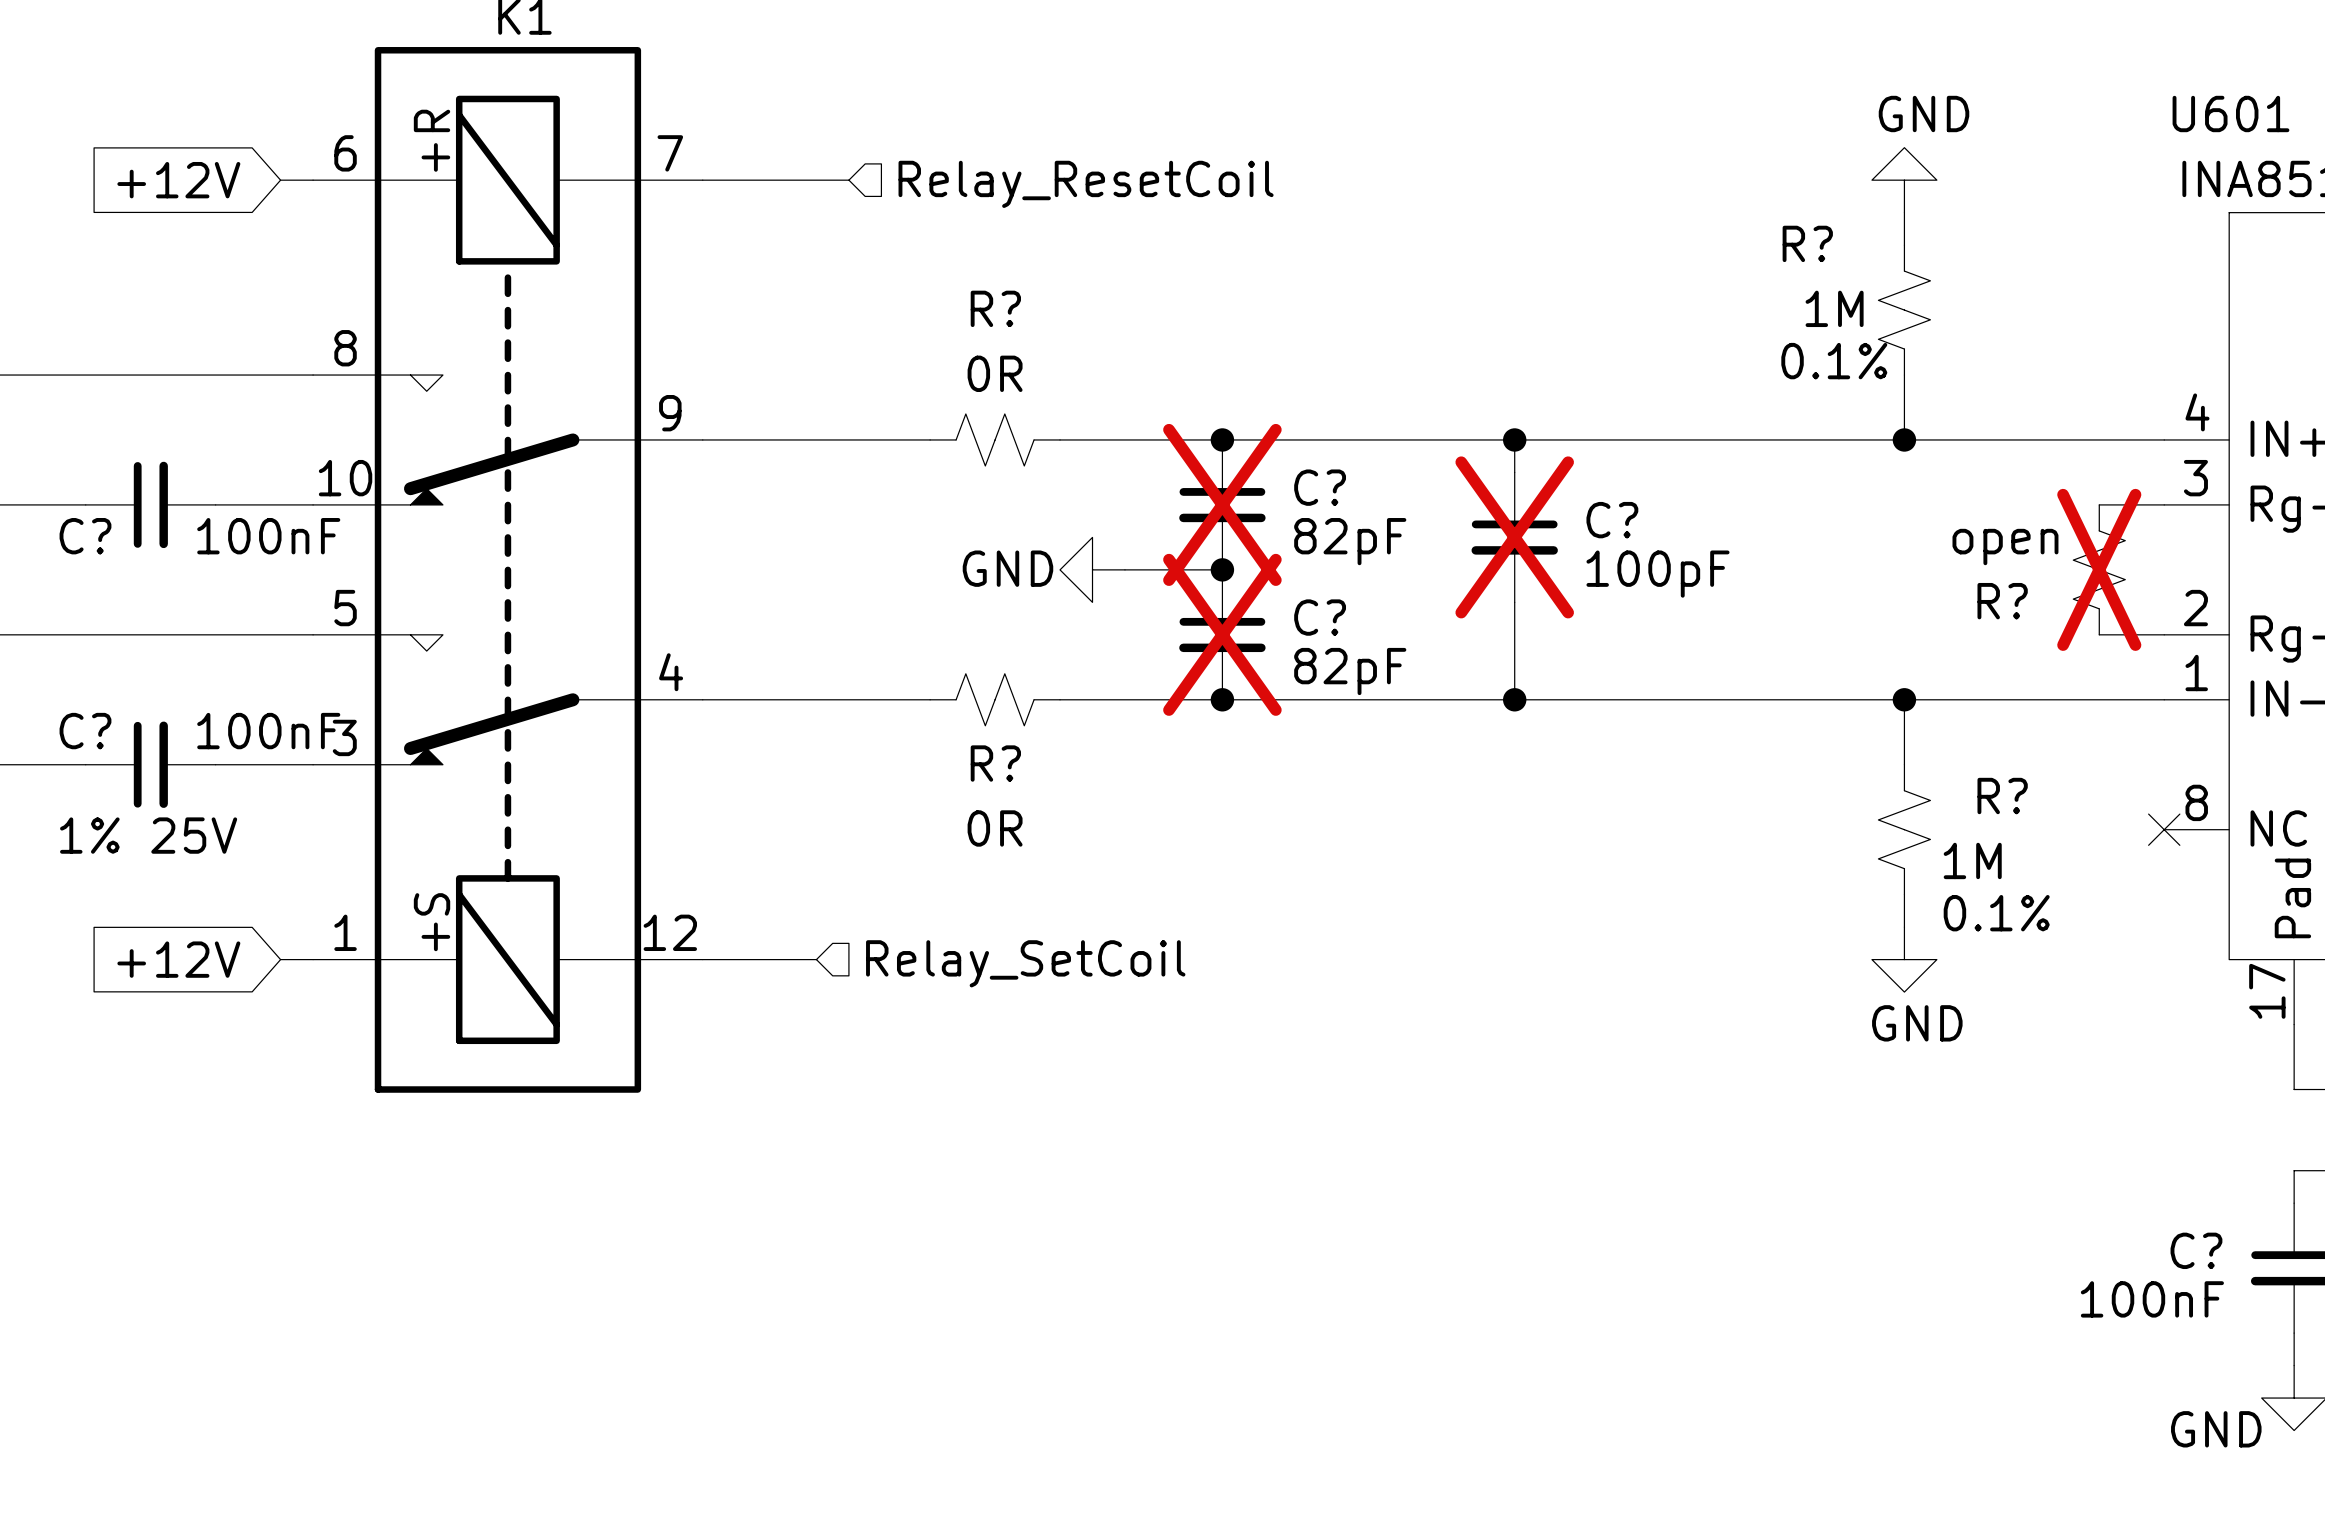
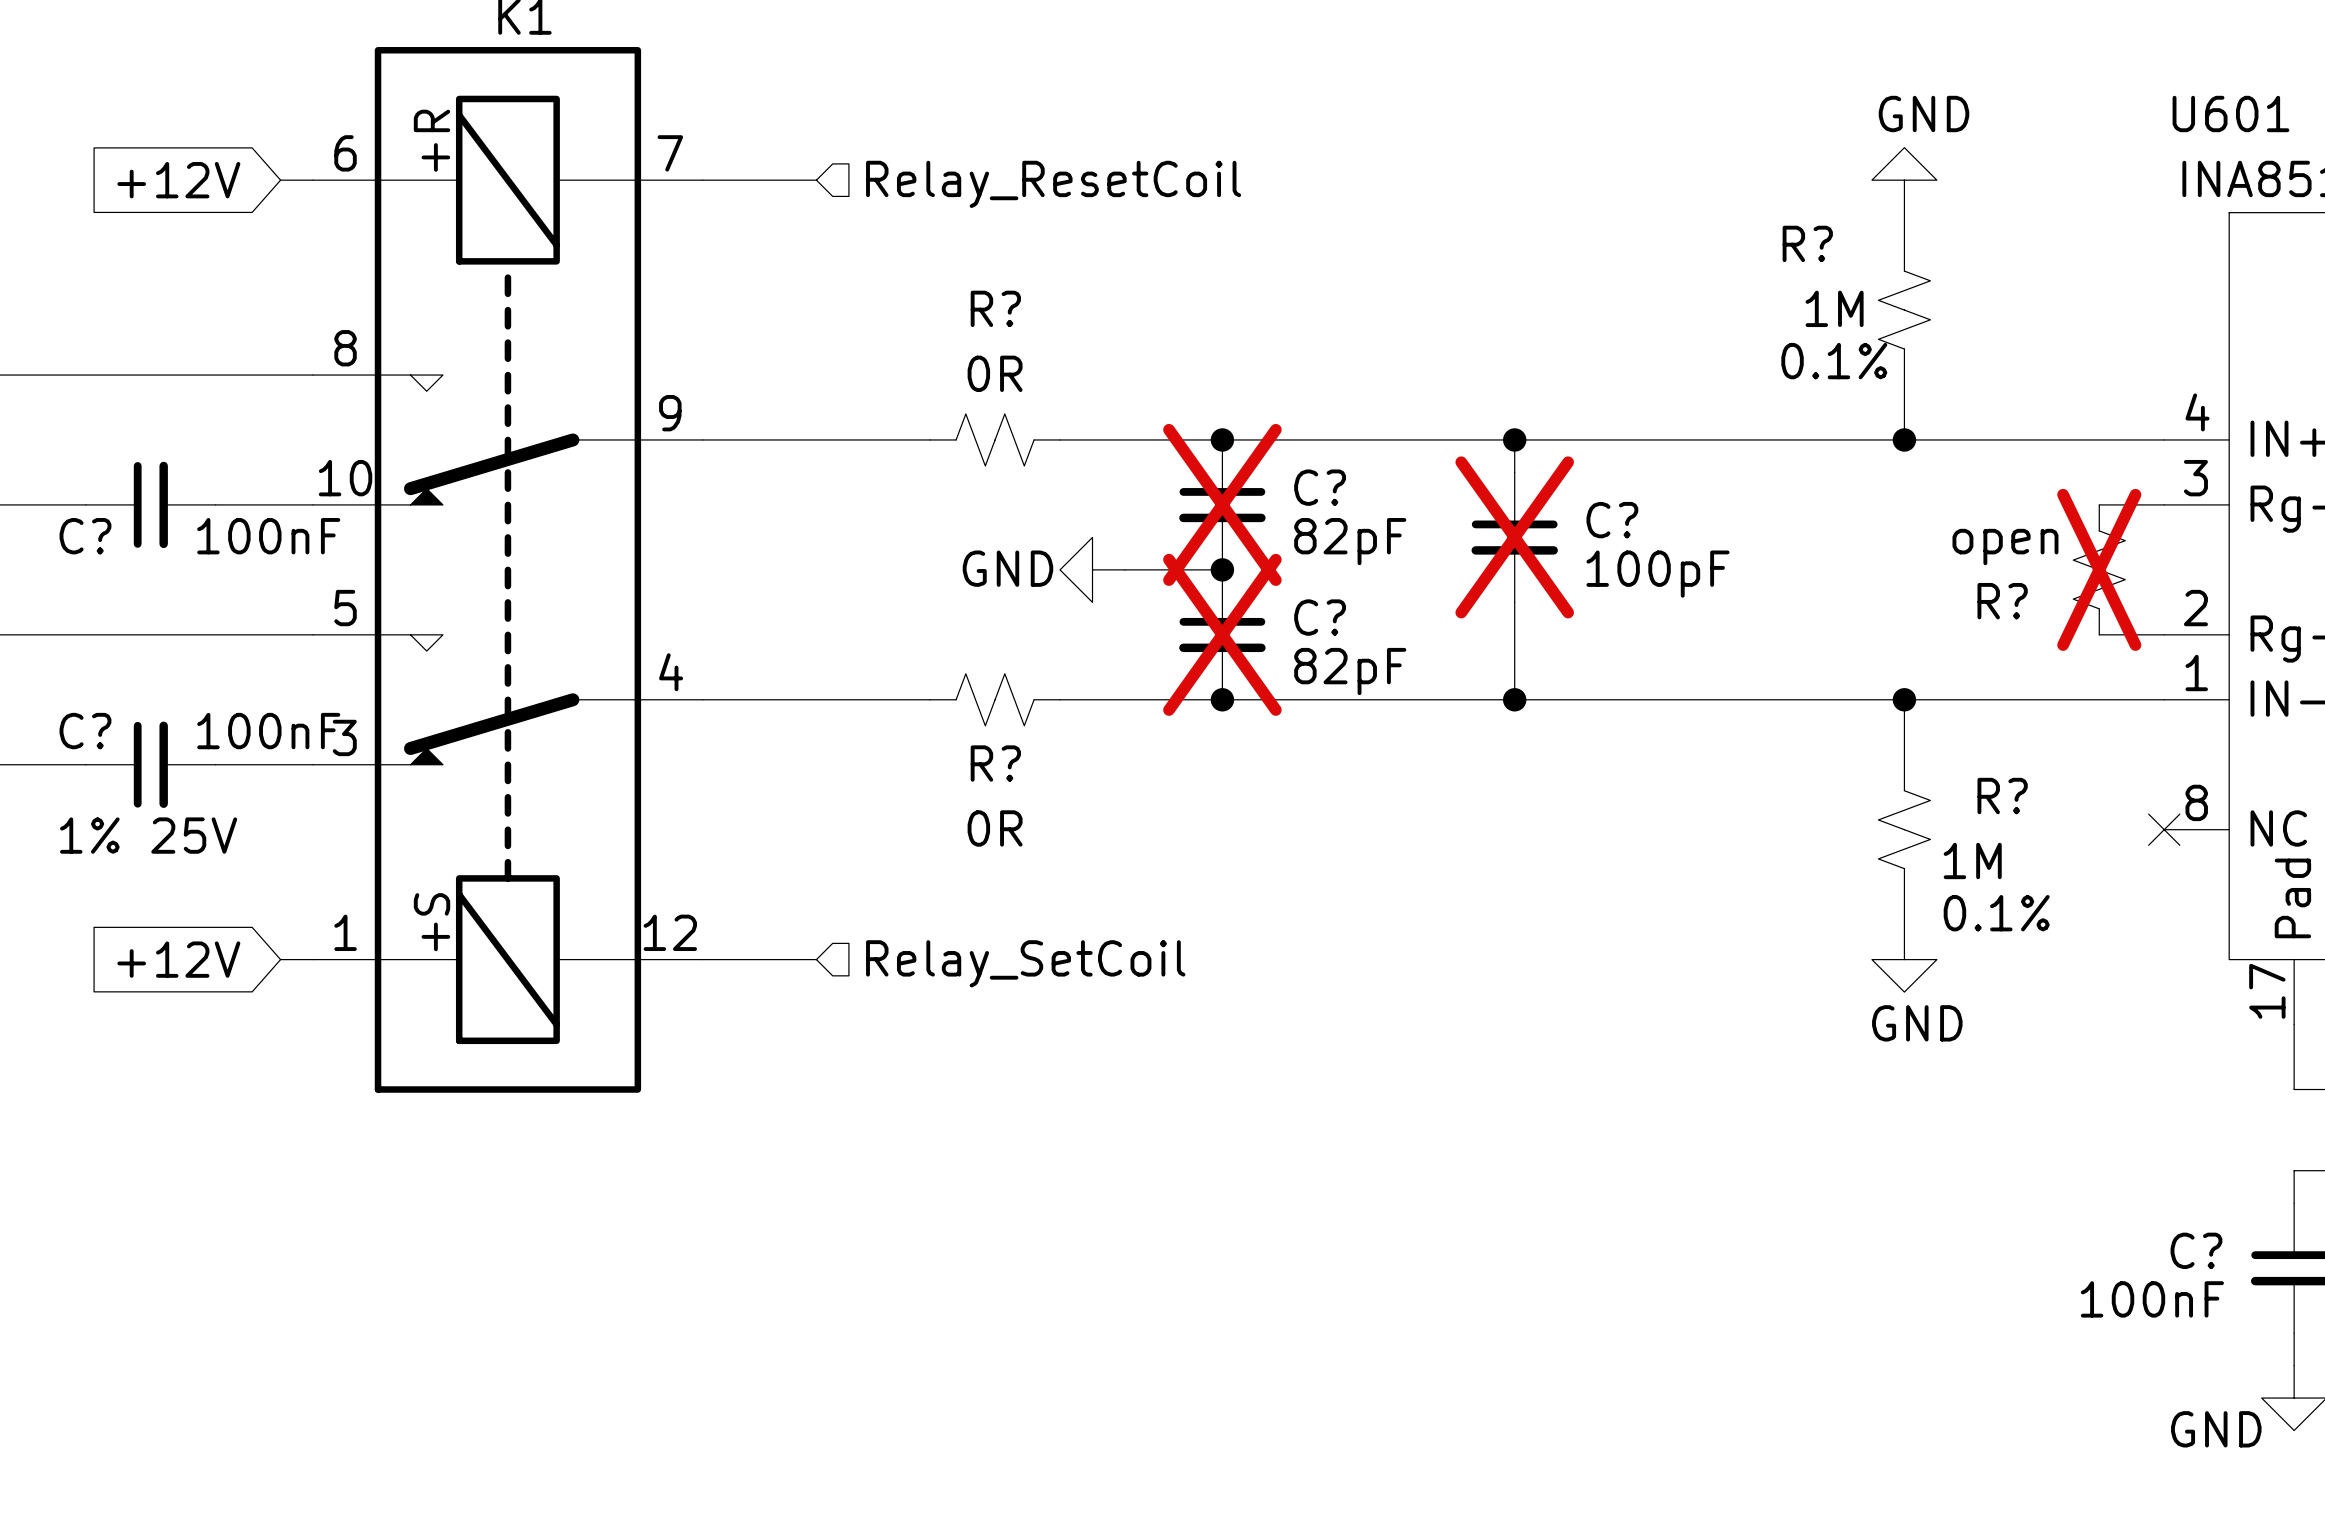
wire: (816, 180) (848, 180) -> none
hierarchical label position: Relay_ResetCoil (1086, 184) -> Relay_ResetCoil (1053, 184)

